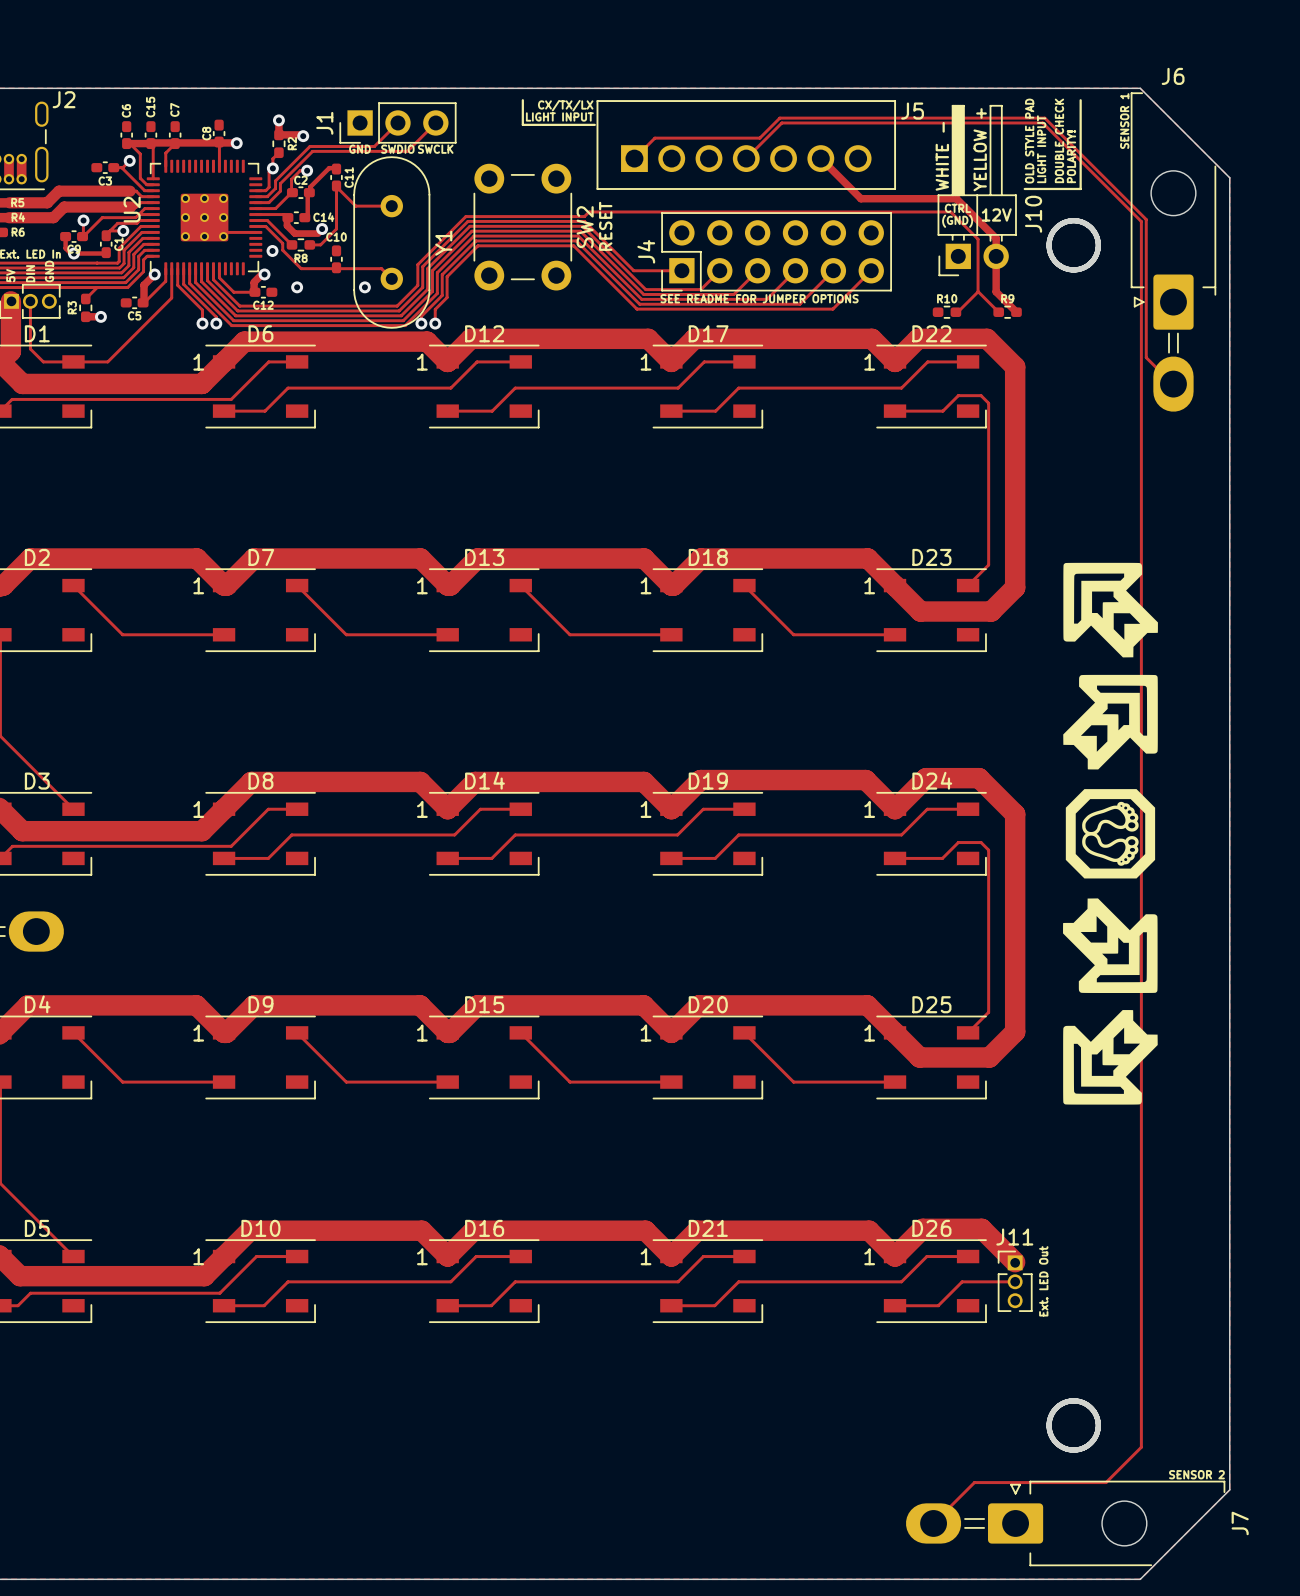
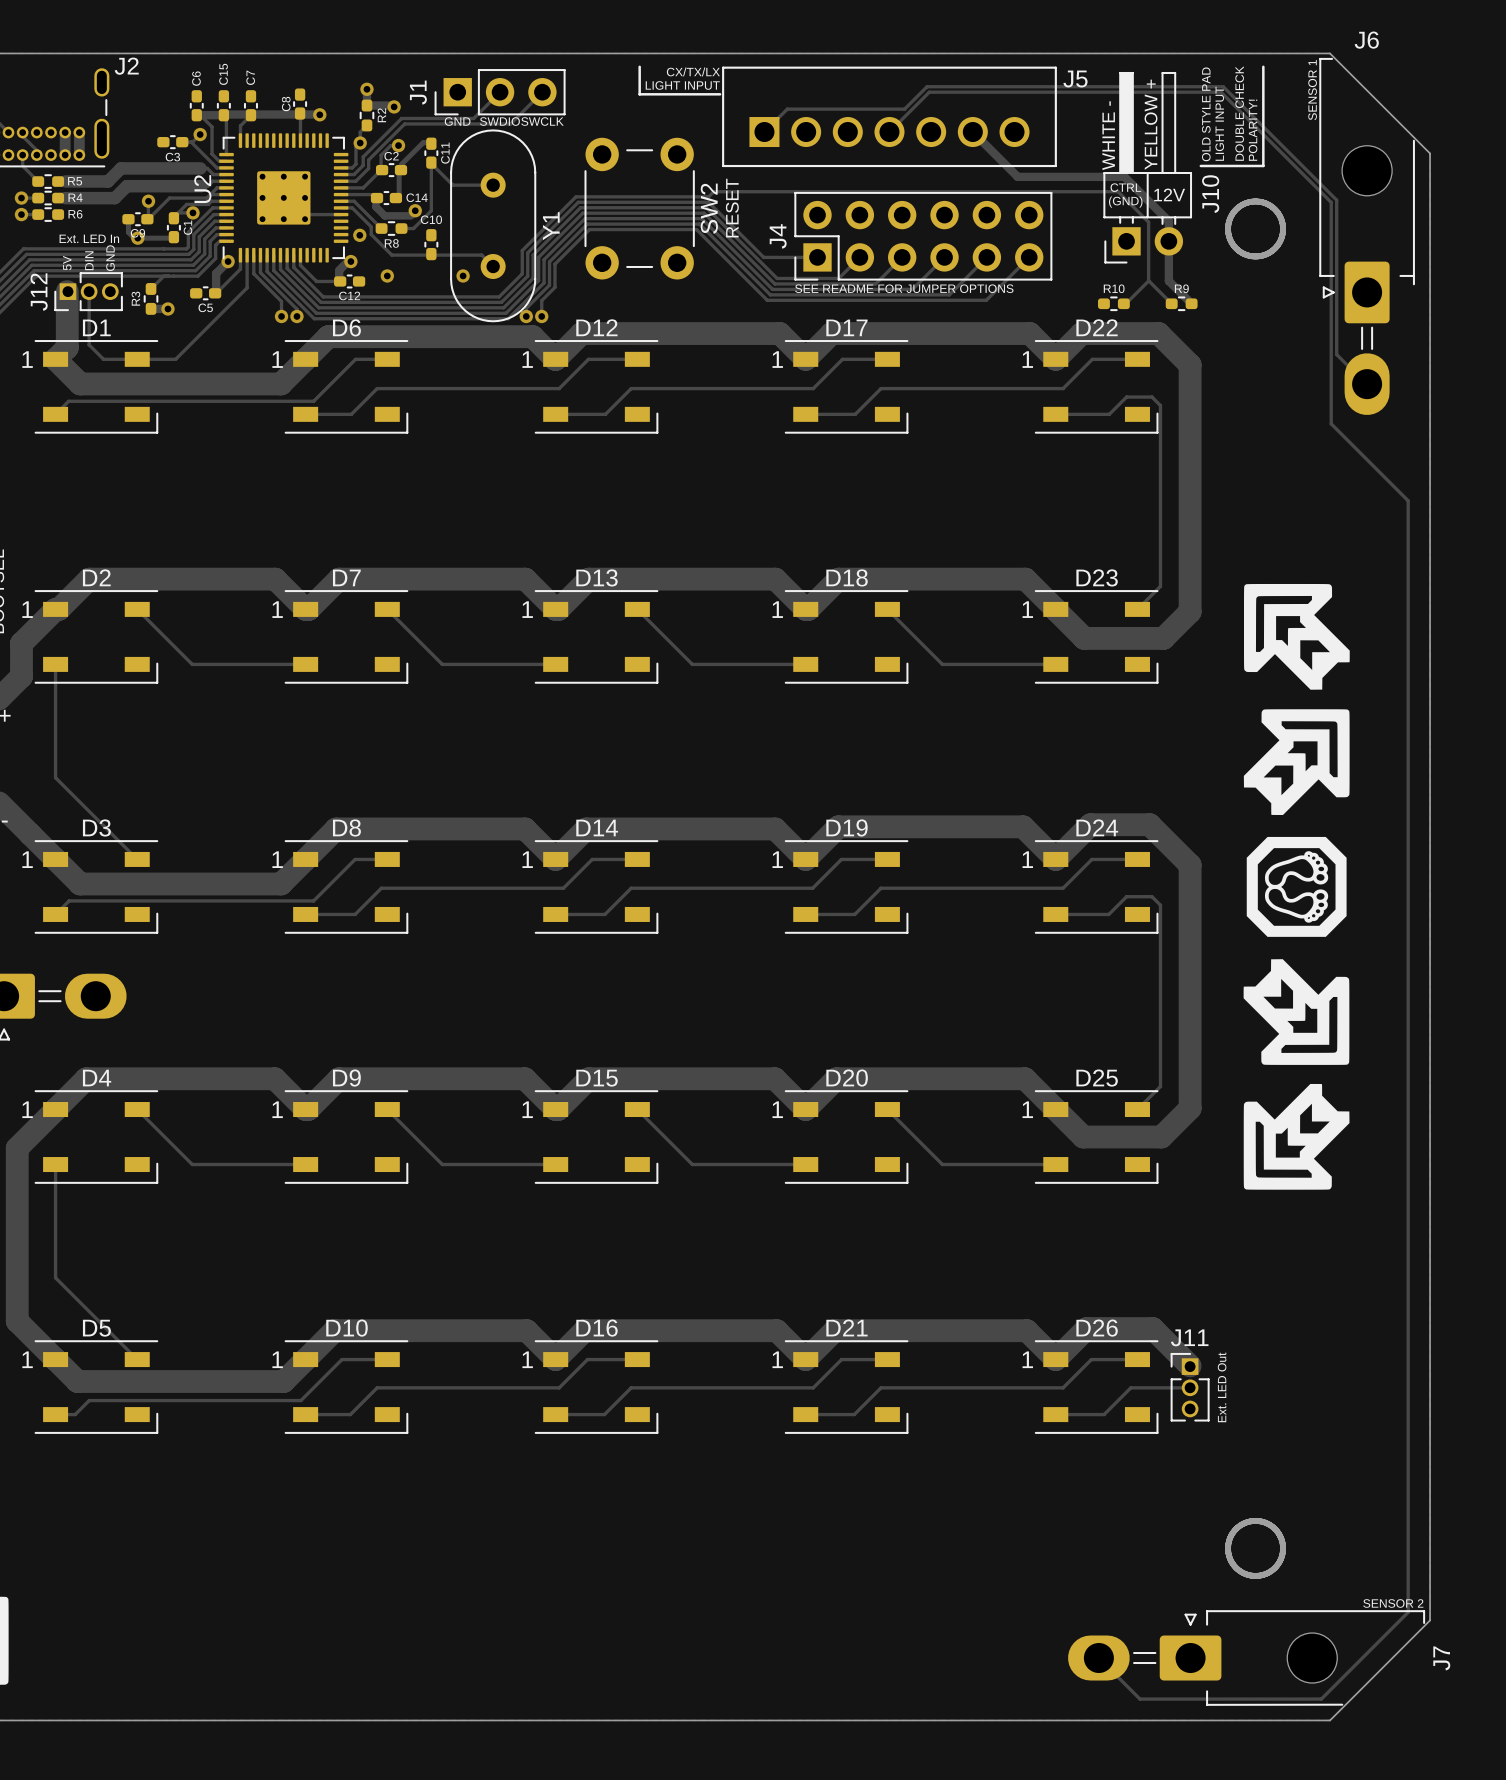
track: (1141, 419) (1141, 1447) (1106, 1482) (974, 1482) (933, 1523) -> (1331, 423) (1408, 500) (1408, 1612) (1321, 1699) (1139, 1699) (1098, 1658)

